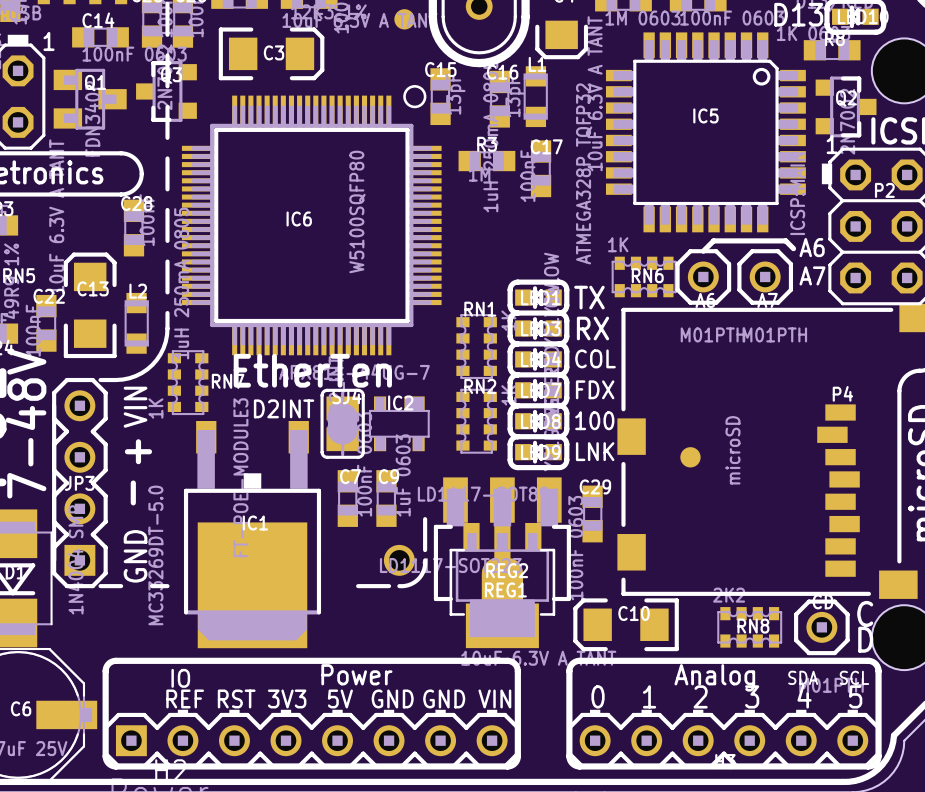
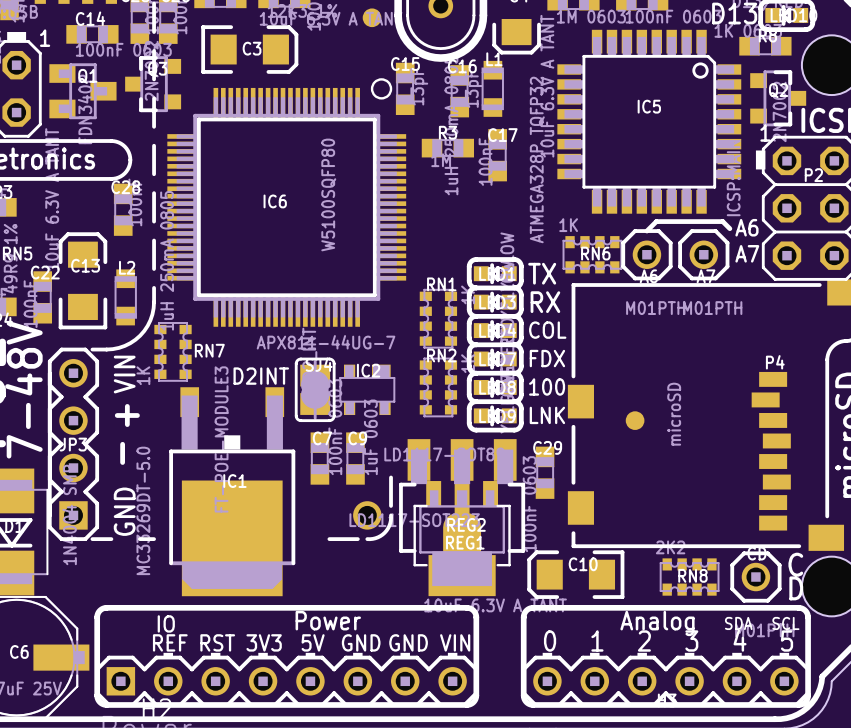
text: EtherTen (312, 370) -> none

